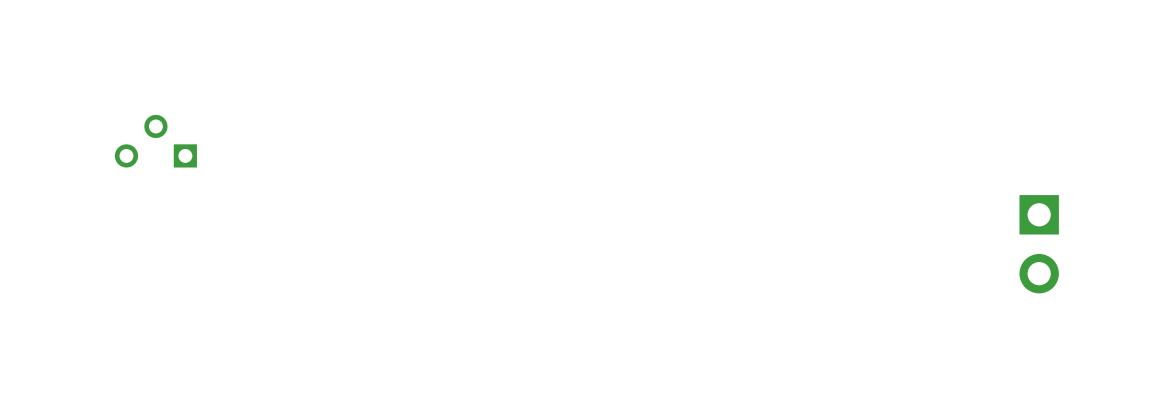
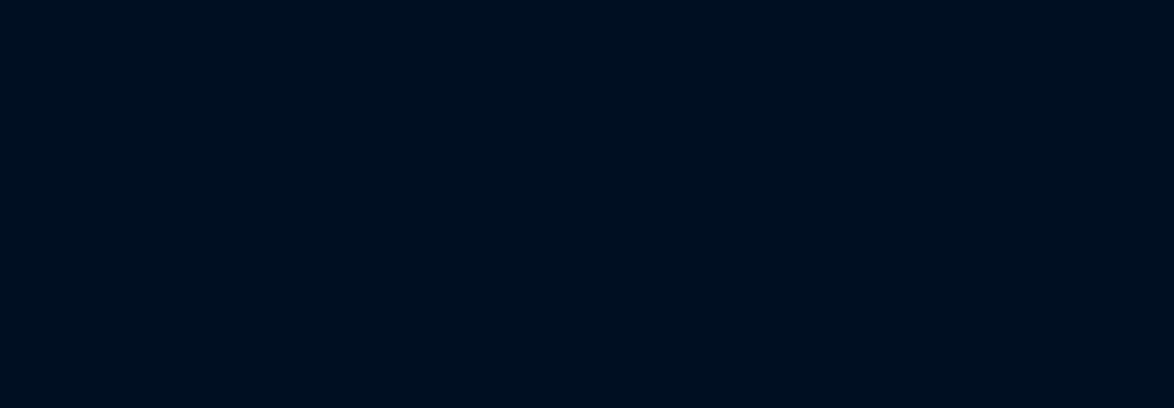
part: (155, 141) -> none
part: (1039, 244) -> none

